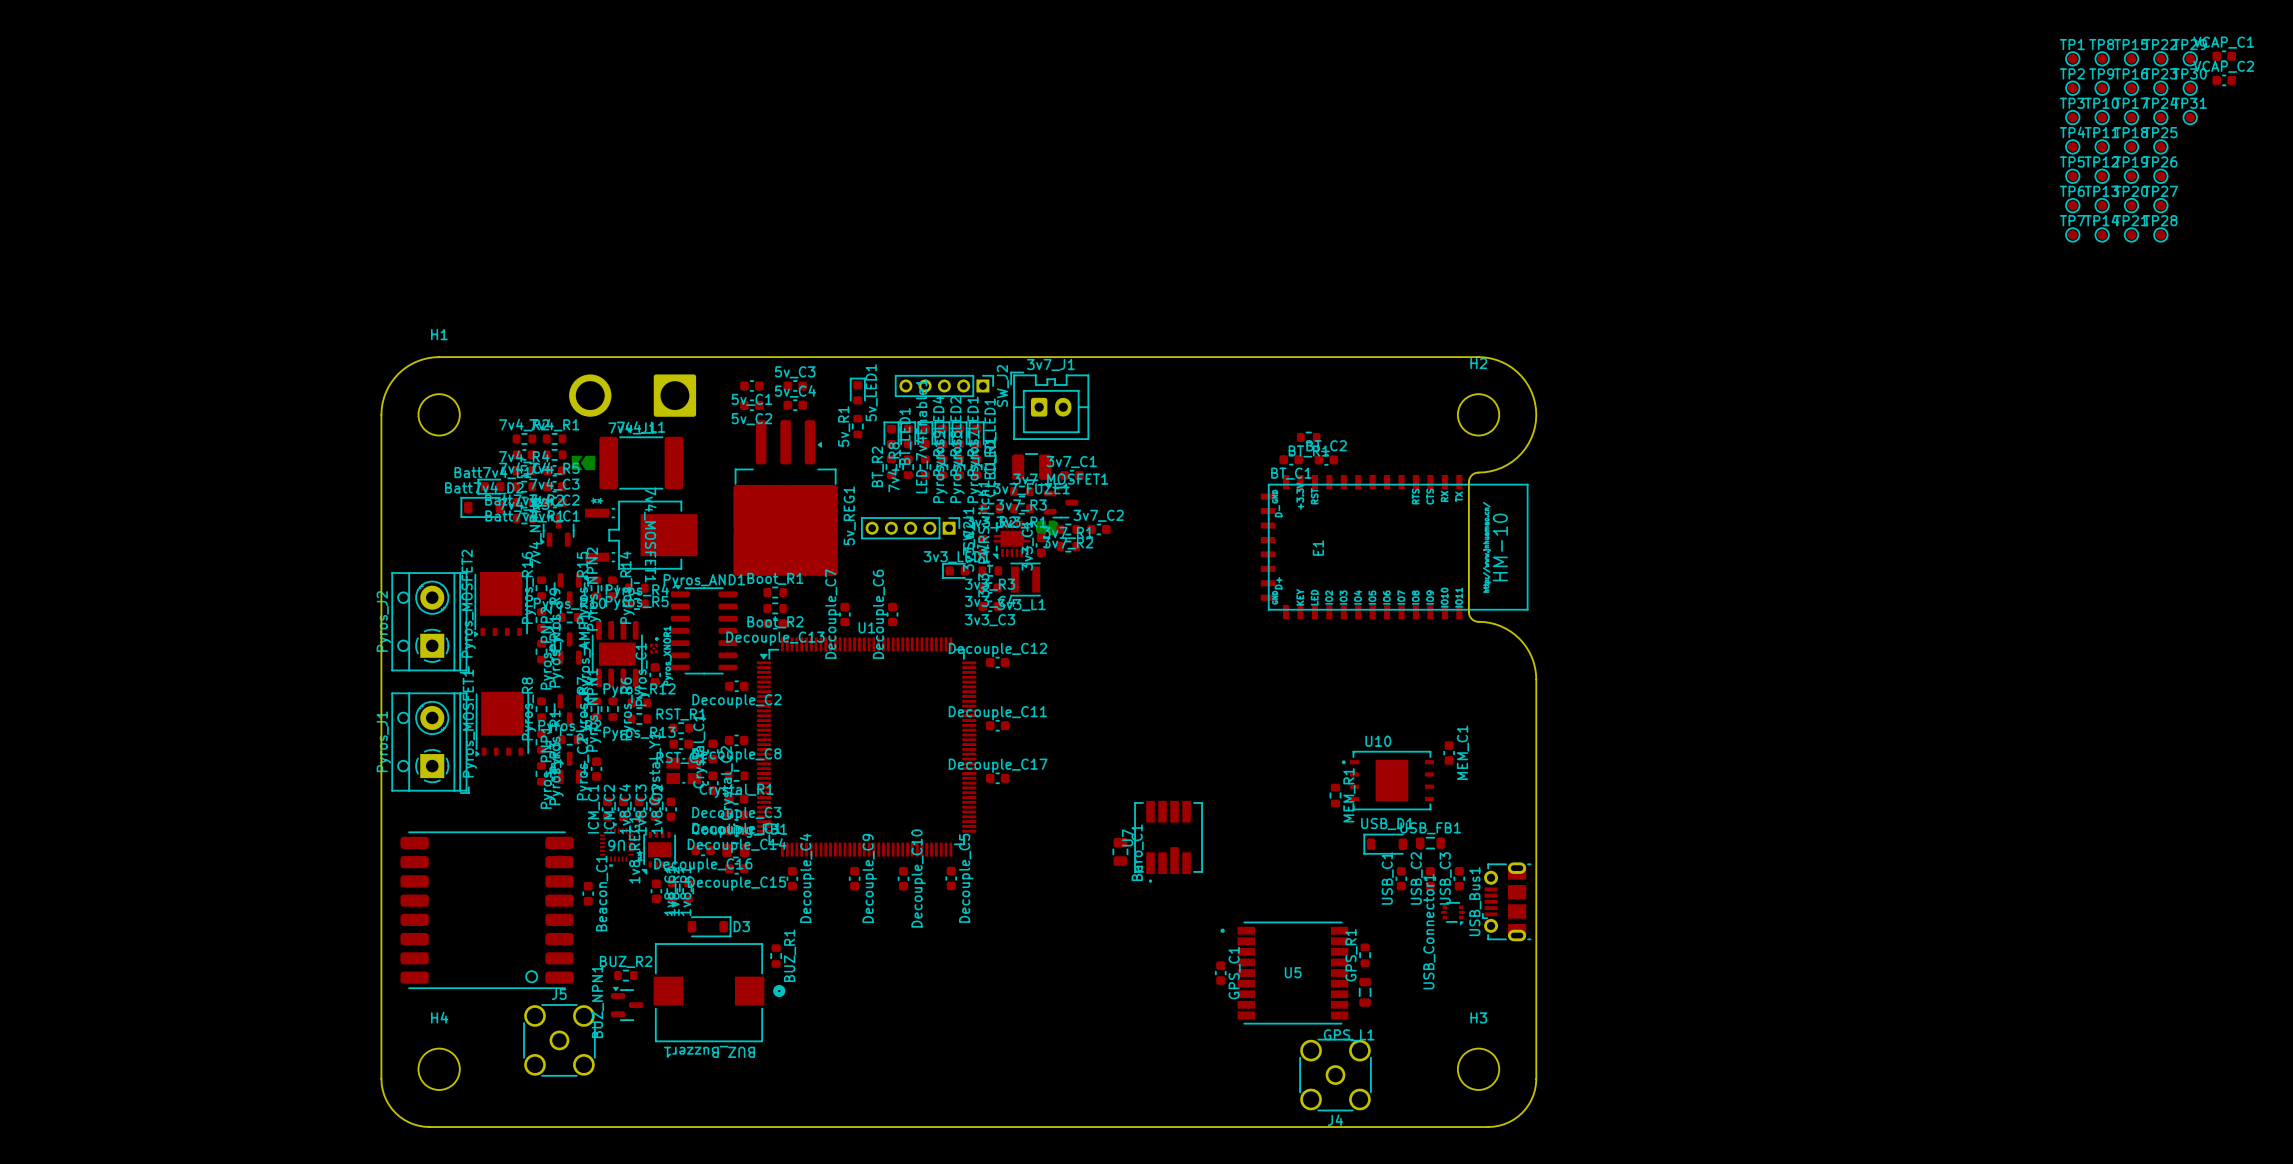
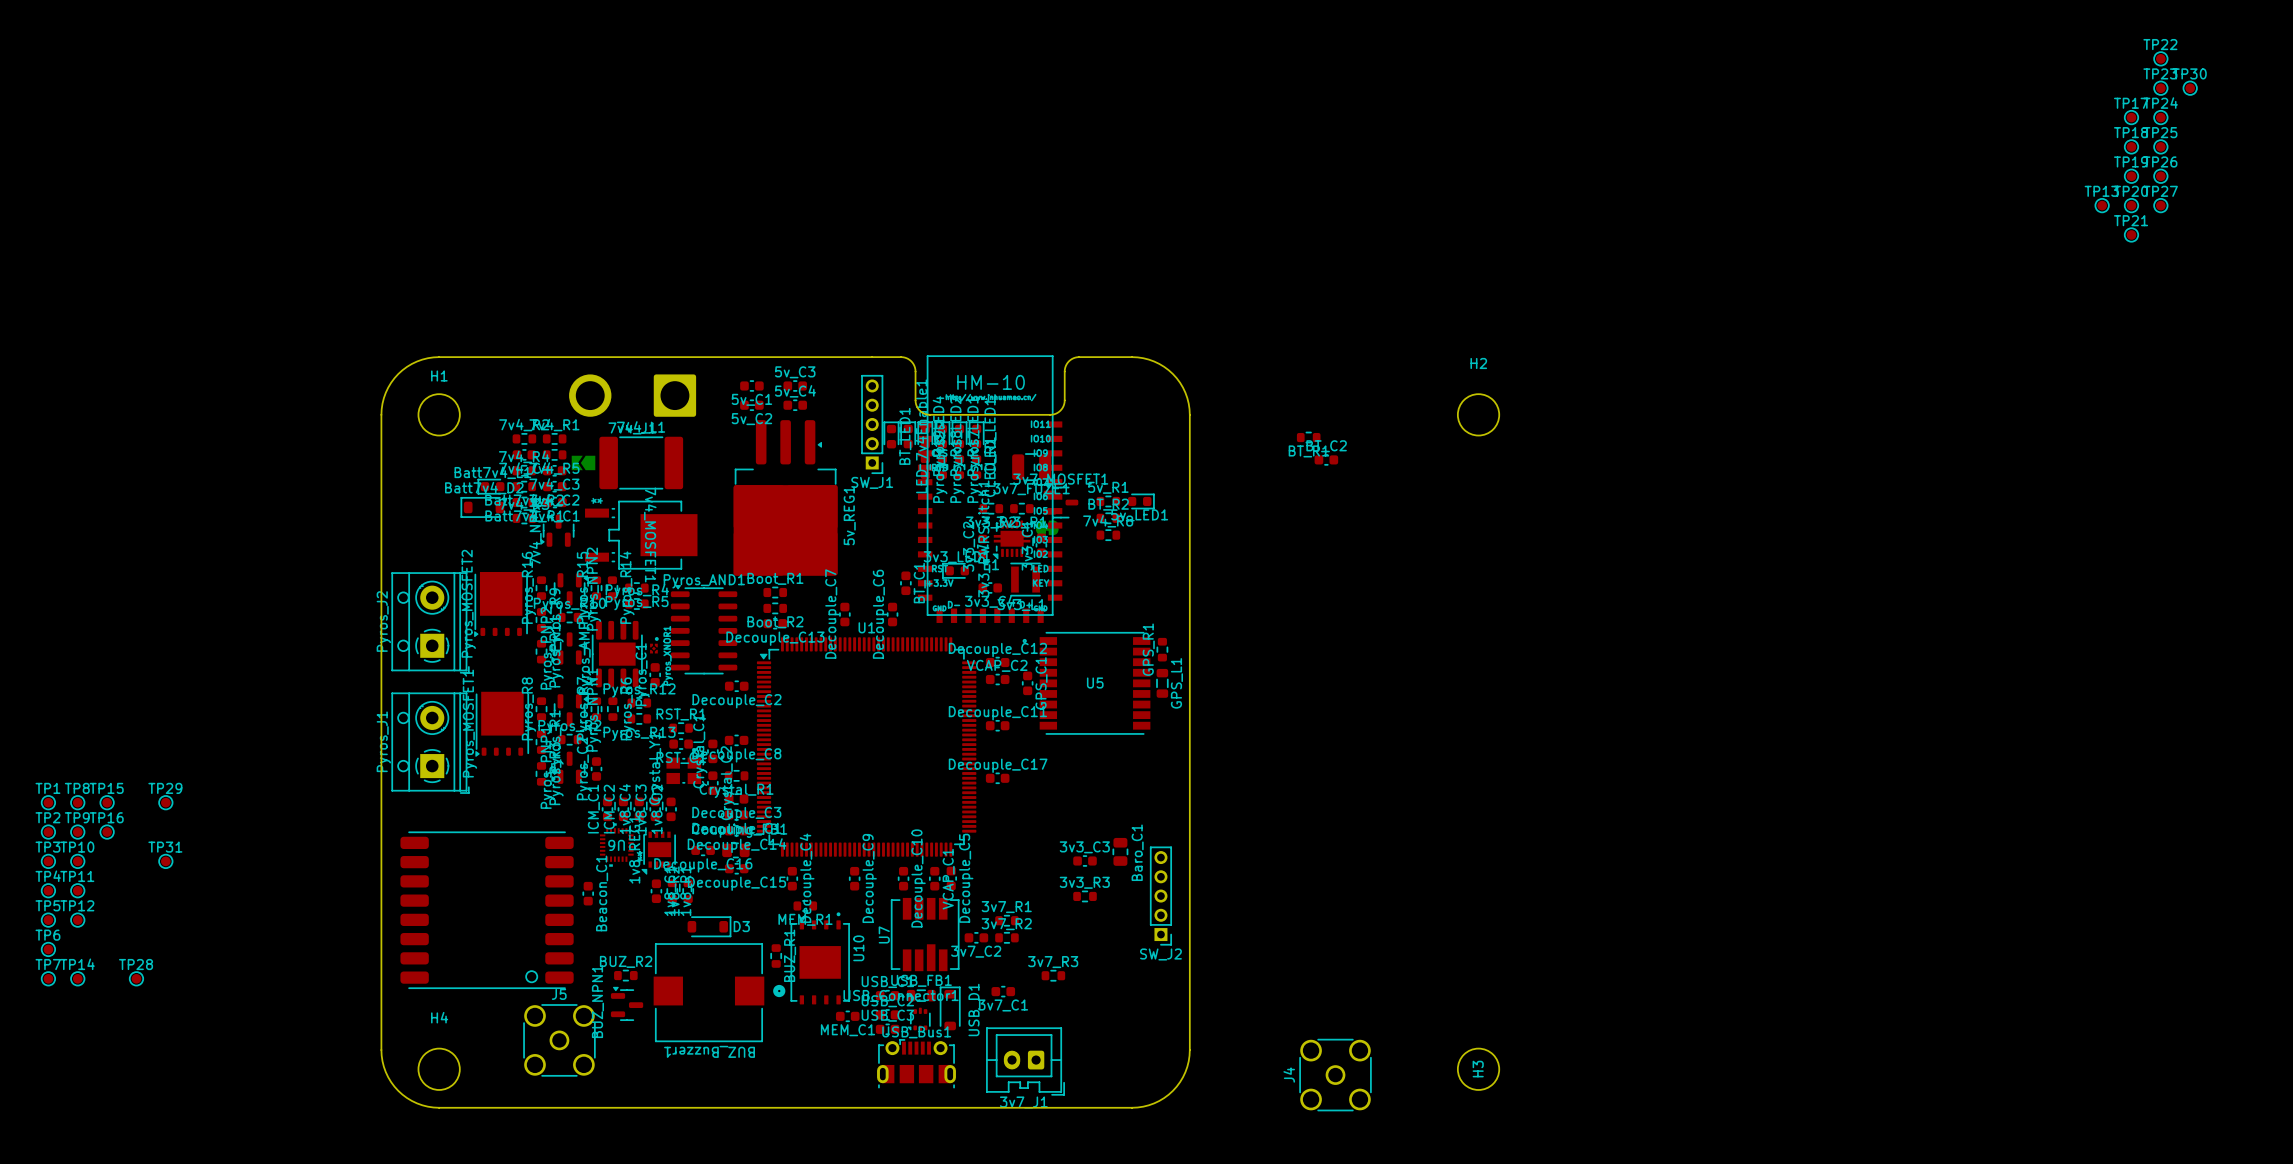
VCAP_C1 rotation: 0° (2224, 56) -> 90° clockwise (934, 878)
VCAP_C1 position: (2224, 56) -> (934, 878)
TP1 position: (2072, 58) -> (48, 802)
TP8 position: (2102, 58) -> (77, 802)
TP15 position: (2131, 58) -> (107, 802)
TP29 position: (2190, 58) -> (165, 802)
VCAP_C2 position: (2224, 80) -> (997, 679)
TP2 position: (2072, 88) -> (48, 832)
TP9 position: (2102, 88) -> (77, 832)
TP16 position: (2131, 88) -> (107, 832)
TP3 position: (2072, 117) -> (48, 861)
TP10 position: (2102, 117) -> (77, 861)
TP31 position: (2190, 117) -> (165, 861)
TP4 position: (2072, 146) -> (48, 890)
TP11 position: (2102, 146) -> (77, 890)
TP5 position: (2072, 176) -> (48, 920)
TP12 position: (2102, 176) -> (77, 920)
TP6 position: (2072, 205) -> (48, 949)
TP7 position: (2072, 234) -> (48, 978)
TP14 position: (2102, 234) -> (77, 978)
TP28 position: (2160, 234) -> (136, 978)
H1 name position: H1 (439, 334) -> H1 (439, 375)
board edge: (901, 357) (1079, 357) -> (901, 357) (909, 360) (915, 367) (917, 407) (922, 412) (929, 414) (1055, 413) (1064, 404) (1065, 366) (1071, 359) (1079, 357)
board edge: (1132, 357) (1484, 357) (1507, 364) (1517, 371) (1528, 385) (1535, 402) (1536, 414) (1533, 432) (1528, 443) (1521, 453) (1507, 464) (1490, 471) (1474, 473) (1468, 482) (1469, 615) (1474, 620) (1495, 624) (1515, 634) (1529, 652) (1536, 673) (1536, 1078) (1533, 1094) (1522, 1112) (1509, 1122) (1488, 1127) (429, 1127) (408, 1122) (399, 1116) (388, 1104) (381, 1084) (381, 1050) -> (1132, 357) (1154, 361) (1172, 374) (1183, 387) (1189, 409) (1189, 1050) (1185, 1072) (1172, 1090) (1154, 1103) (1132, 1107) (433, 1107) (417, 1103) (398, 1090) (385, 1072) (381, 1050)
SW_J2 rotation: 0° (944, 385) -> 90° clockwise (1160, 896)
SW_J2 position: (944, 385) -> (1160, 896)
5v_LED1 rotation: 0° (857, 391) -> 90° clockwise (1141, 501)
5v_LED1 position: (857, 391) -> (1141, 501)
3v7_J1 rotation: 0° (1049, 405) -> 180° (1025, 1061)
3v7_J1 position: (1049, 405) -> (1025, 1061)
5v_R1 rotation: 0° (857, 426) -> 90° clockwise (1108, 501)
5v_R1 position: (857, 426) -> (1108, 501)
BT_C1 rotation: 0° (1291, 459) -> 90° clockwise (905, 583)
BT_C1 position: (1291, 459) -> (905, 583)
3v7_C1 name position: 3v7_C1 (1071, 462) -> 3v7_C1 (1003, 1005)
BT_R2 rotation: 0° (891, 467) -> 90° clockwise (1108, 518)
BT_R2 position: (891, 467) -> (1108, 518)
7v4_R8 rotation: 0° (908, 467) -> 90° clockwise (1108, 535)
7v4_R8 position: (908, 467) -> (1108, 535)
BT_C1 name position: BT_C1 (1291, 473) -> BT_C1 (919, 583)
3v7_C1 position: (1071, 475) -> (1003, 991)
3v7_R3 position: (1021, 491) -> (1053, 975)
3v7_R3 name position: 3v7_R3 (1021, 505) -> 3v7_R3 (1053, 962)
3v7_C2 name position: 3v7_C2 (1098, 515) -> 3v7_C2 (976, 951)
SW_J1 rotation: 0° (910, 528) -> 90° clockwise (872, 424)
SW_J1 position: (910, 528) -> (872, 424)
3v7_R2 position: (1068, 529) -> (1006, 937)
3v7_C2 position: (1098, 529) -> (976, 937)
3v7_R2 name position: 3v7_R2 (1068, 543) -> 3v7_R2 (1006, 924)
3v7_R1 position: (1068, 546) -> (1006, 920)
E1 rotation: 0° (1394, 547) -> 90° counterclockwise (990, 489)
E1 position: (1394, 547) -> (990, 489)
3v3_R3 position: (990, 570) -> (1085, 896)
3v3_R3 name position: 3v3_R3 (990, 584) -> 3v3_R3 (1084, 882)
3v3_C3 position: (990, 606) -> (1085, 860)
3v3_C3 name position: 3v3_C3 (990, 620) -> 3v3_C3 (1084, 847)
MEM_C1 rotation: 0° (1449, 753) -> 90° clockwise (847, 1016)
MEM_C1 position: (1449, 753) -> (847, 1016)
U10 rotation: 0° (1387, 780) -> 90° clockwise (820, 958)
U10 position: (1387, 780) -> (820, 958)
MEM_R1 rotation: 0° (1335, 795) -> 90° clockwise (805, 905)
MEM_R1 position: (1335, 795) -> (805, 905)
U7 position: (1168, 841) -> (925, 938)
USB_FB1 position: (1430, 843) -> (921, 995)
USB_D1 rotation: 0° (1385, 844) -> 90° clockwise (950, 1008)
USB_D1 position: (1385, 844) -> (950, 1008)
USB_C1 rotation: 0° (1401, 878) -> 90° clockwise (887, 995)
USB_C1 position: (1401, 878) -> (887, 995)
USB_C2 rotation: 0° (1430, 878) -> 90° clockwise (887, 1014)
USB_C2 position: (1430, 878) -> (887, 1014)
USB_C3 rotation: 0° (1459, 878) -> 90° clockwise (887, 1029)
USB_C3 position: (1459, 878) -> (887, 1029)
USB_Bus1 rotation: 0° (1506, 901) -> 90° clockwise (916, 1063)
USB_Bus1 position: (1506, 901) -> (916, 1063)
USB_Connector1 rotation: 0° (1453, 913) -> 90° clockwise (919, 1019)
USB_Connector1 position: (1453, 913) -> (919, 1019)
GPS_R1 position: (1365, 955) -> (1162, 649)
GPS_C1 position: (1220, 973) -> (1027, 683)
U5 position: (1284, 973) -> (1086, 683)
GPS_L1 position: (1365, 992) -> (1162, 683)
H3 name rotation: 0° (1478, 1017) -> 90° counterclockwise (1478, 1069)
H3 name position: H3 (1478, 1017) -> H3 (1478, 1069)
GPS_L1 name rotation: 0° (1349, 1035) -> 90° counterclockwise (1176, 683)
J4 name rotation: 0° (1335, 1120) -> 90° counterclockwise (1289, 1075)
J4 name position: J4 (1335, 1120) -> J4 (1289, 1075)

